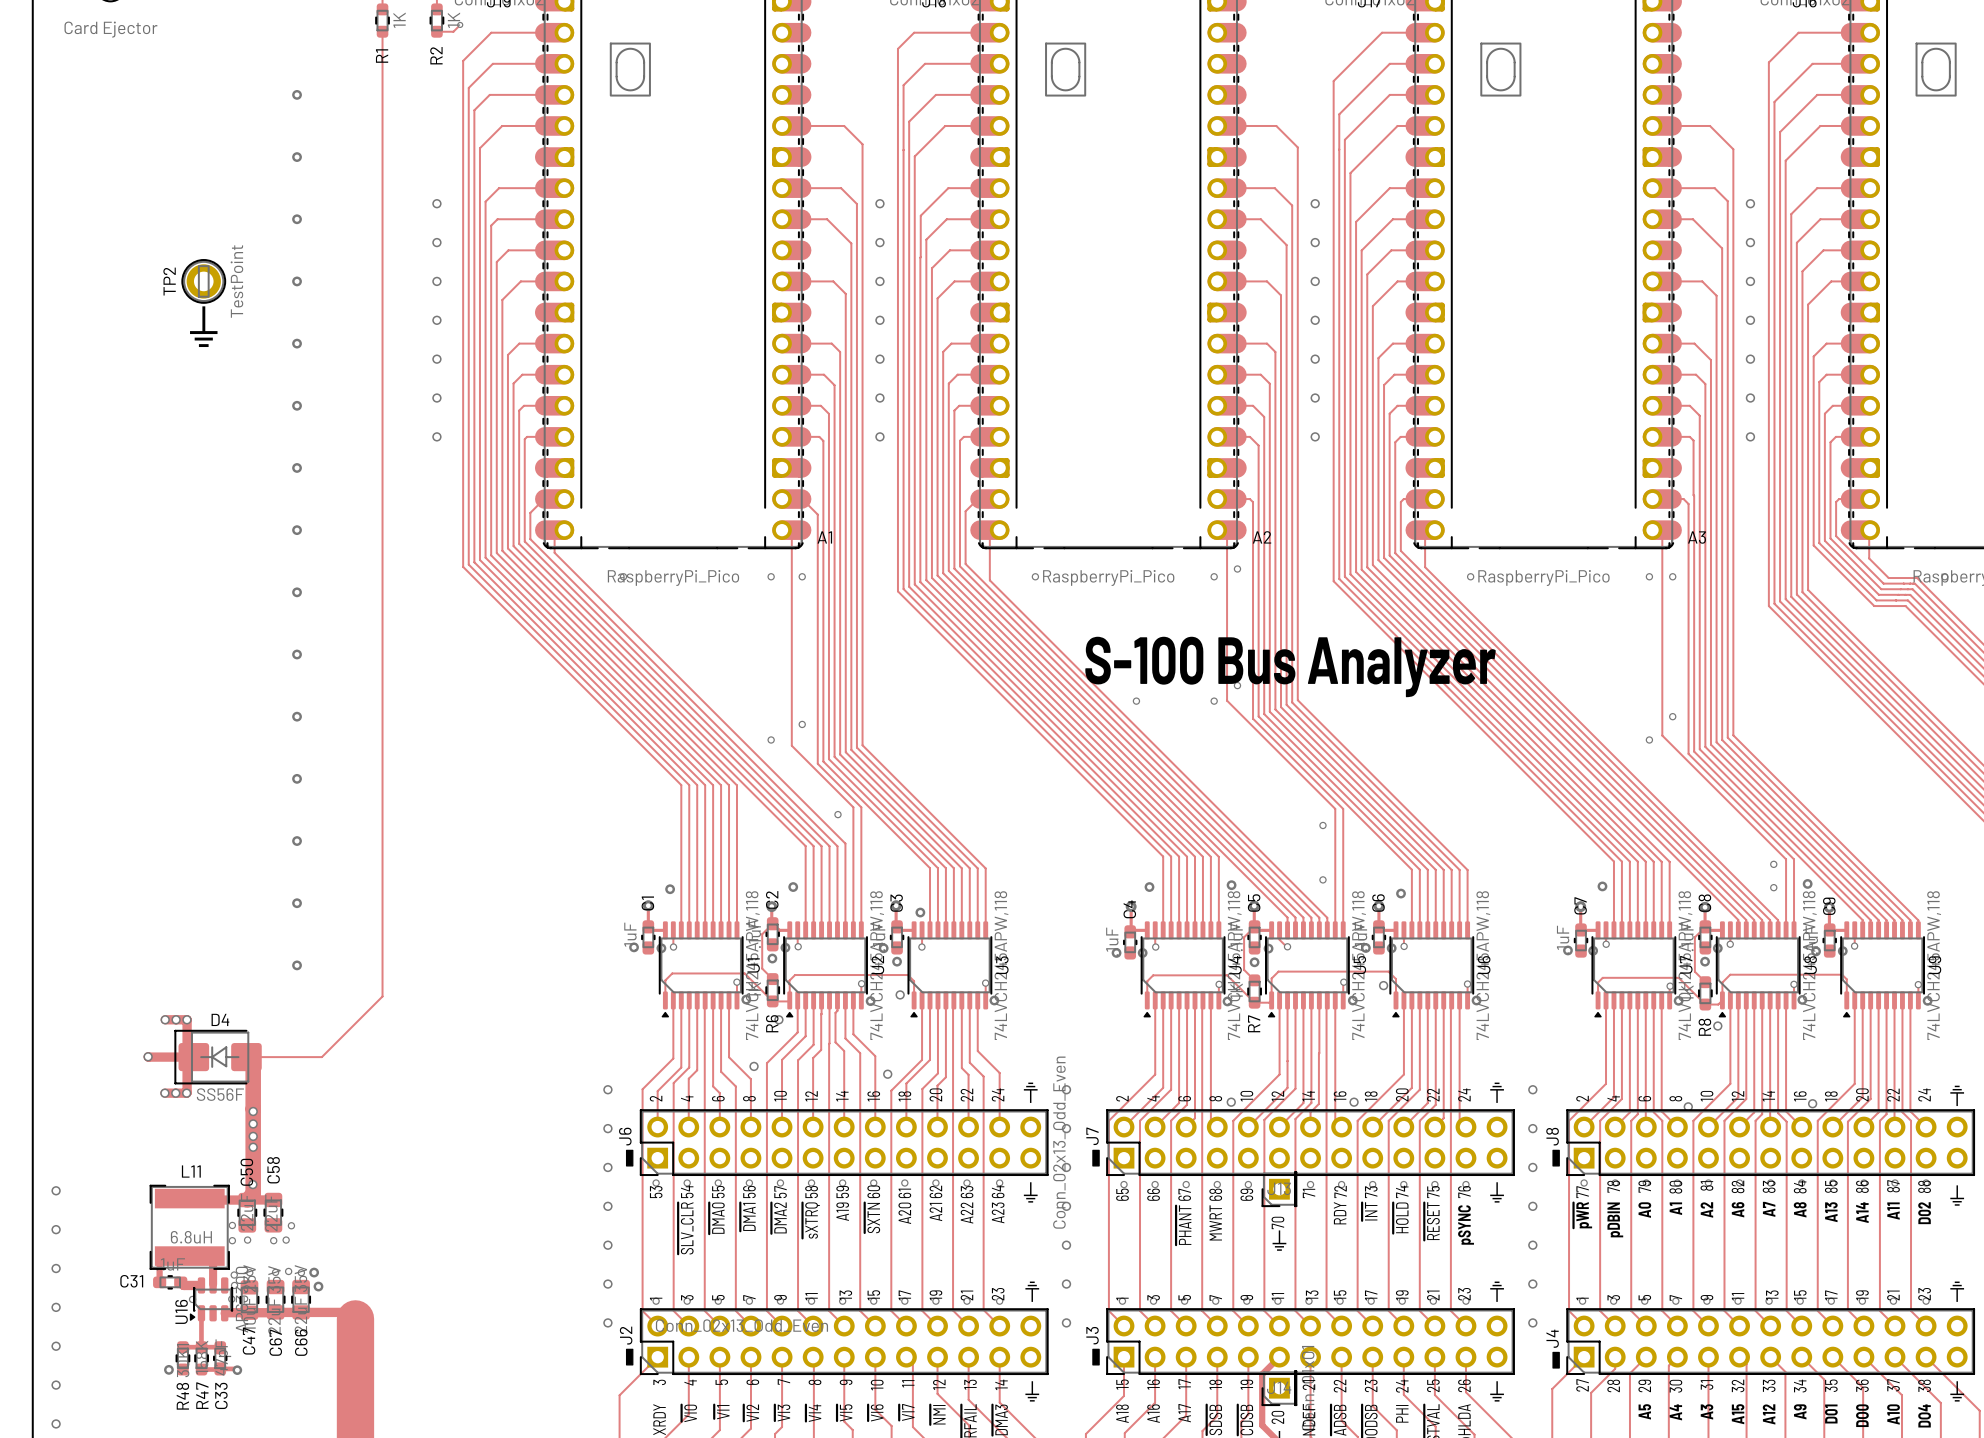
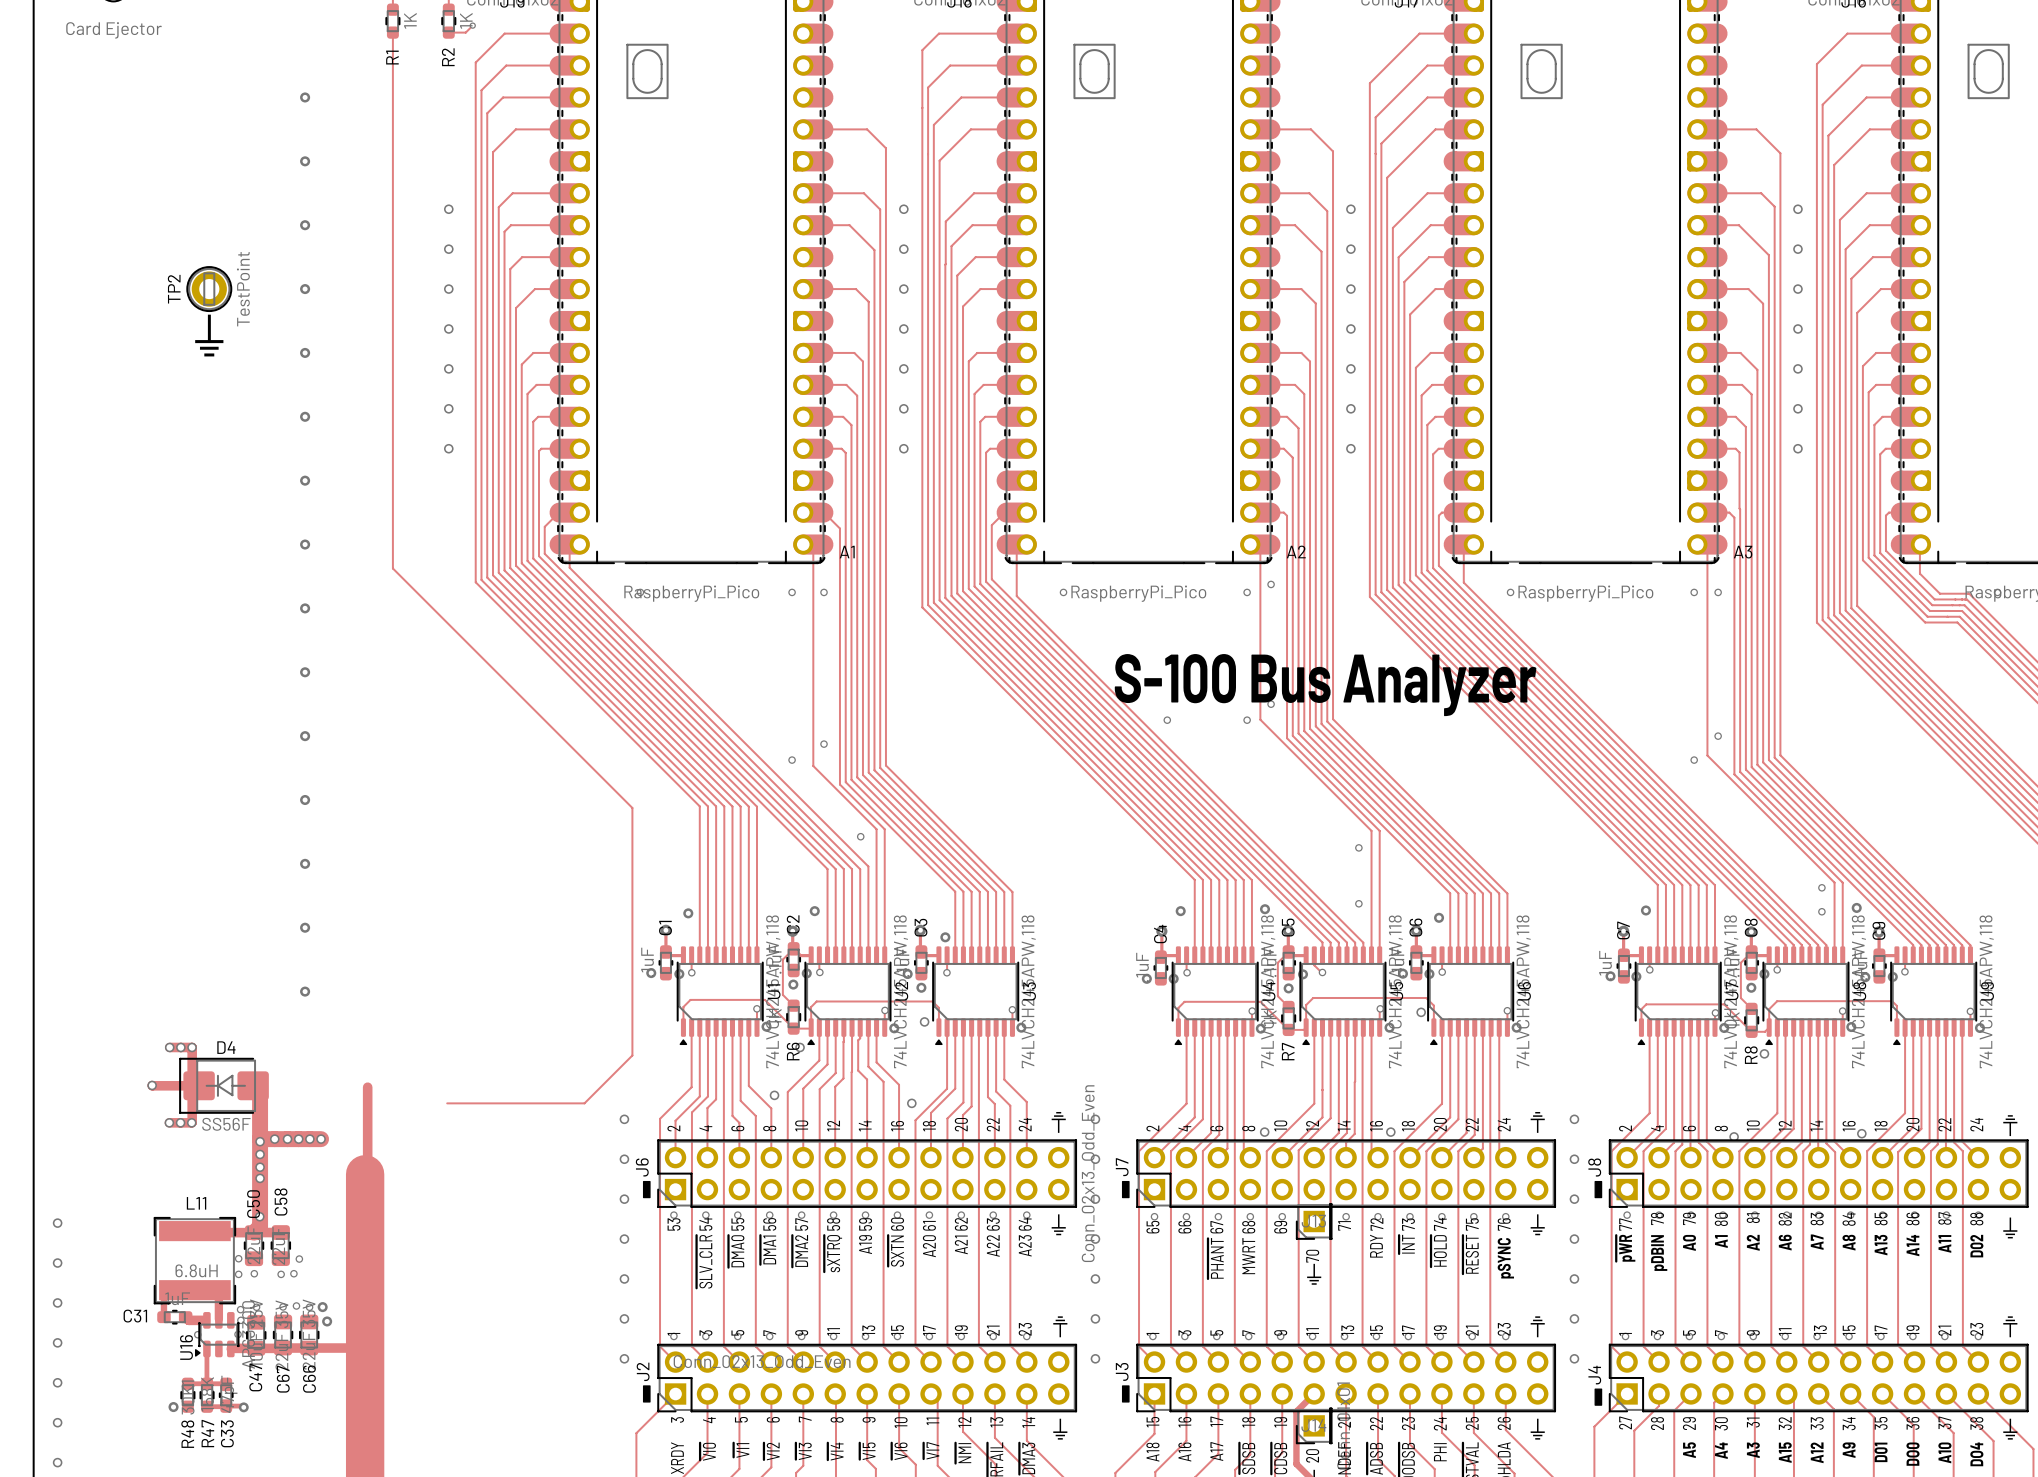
track: (382, 553) (382, 996) (321, 1057) (246, 1057) -> (392, 568) (632, 807) (632, 1055) (584, 1103) (447, 1103)
track: none -> (367, 1087) (367, 1171) (365, 1174) (365, 1354)
track: none -> (260, 1139) (321, 1139)
via: none -> (274, 1139)
via: none -> (287, 1139)
via: none -> (298, 1139)
via: none -> (309, 1139)
via: none -> (321, 1139)

